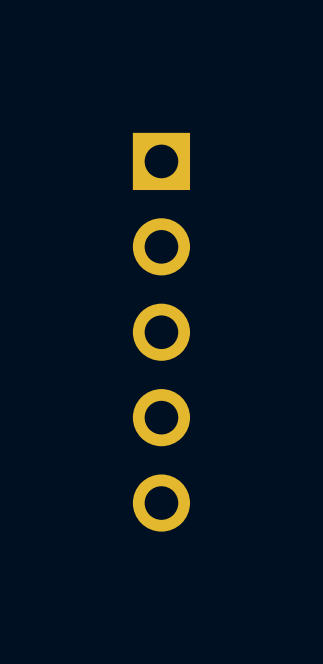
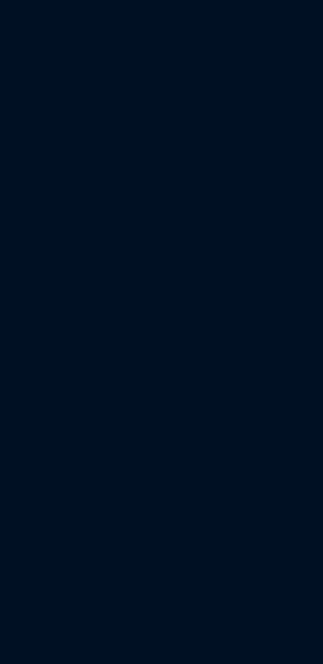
part: (161, 332) -> none

